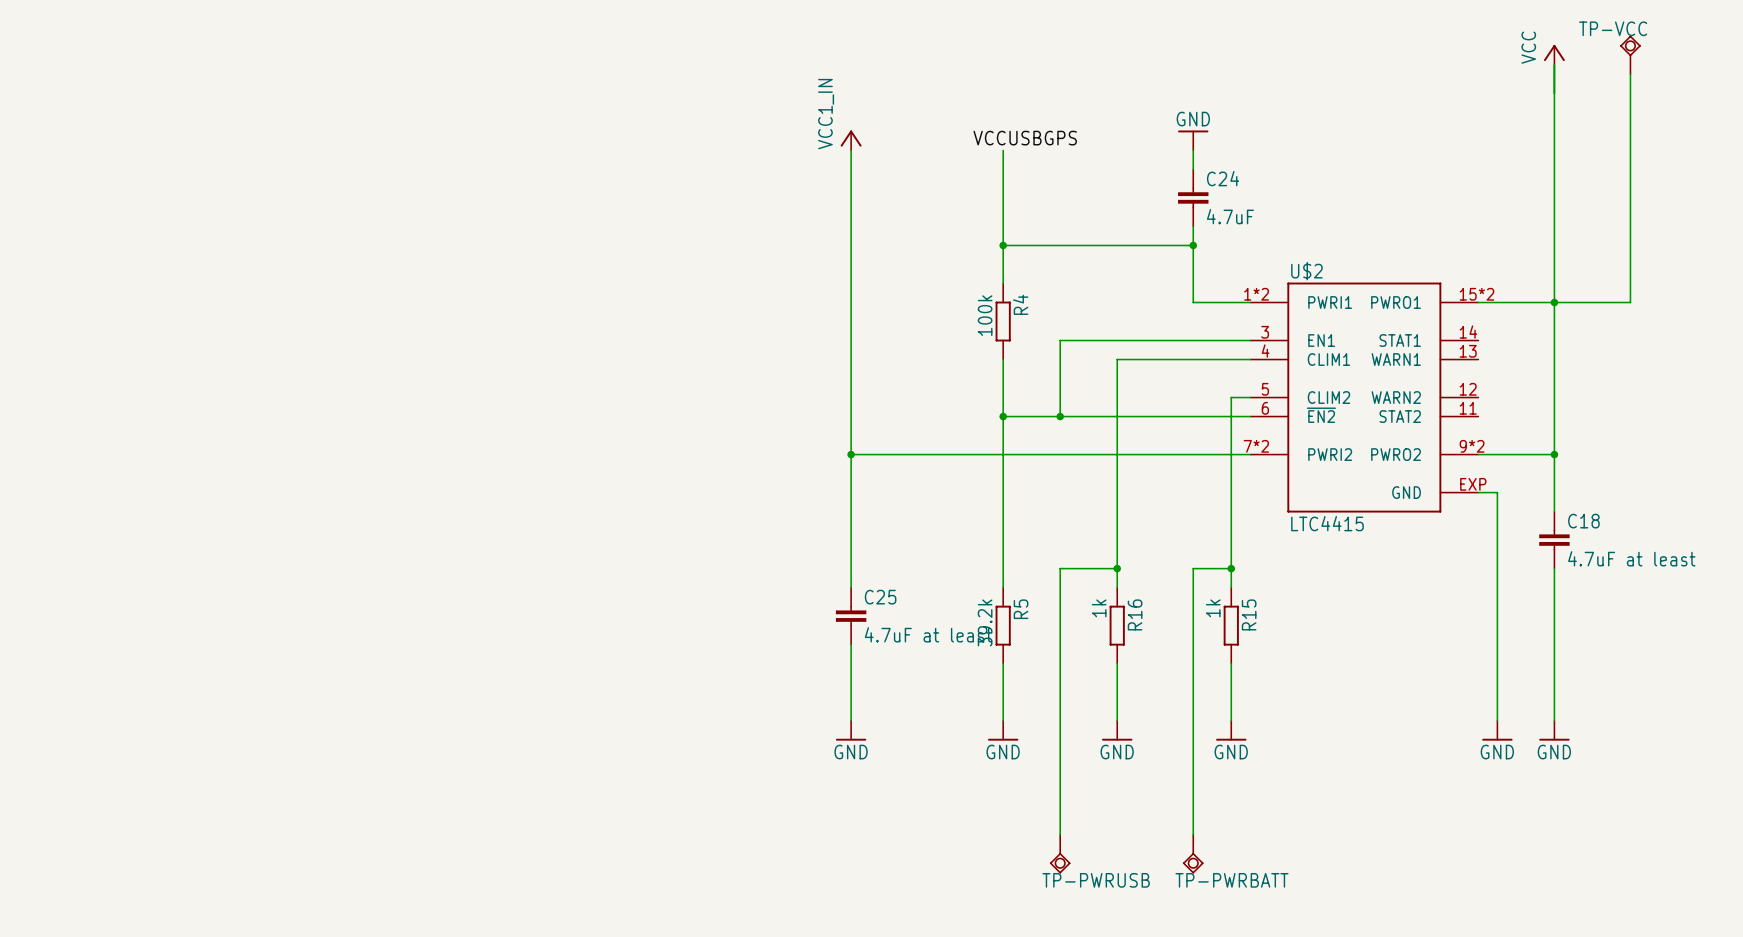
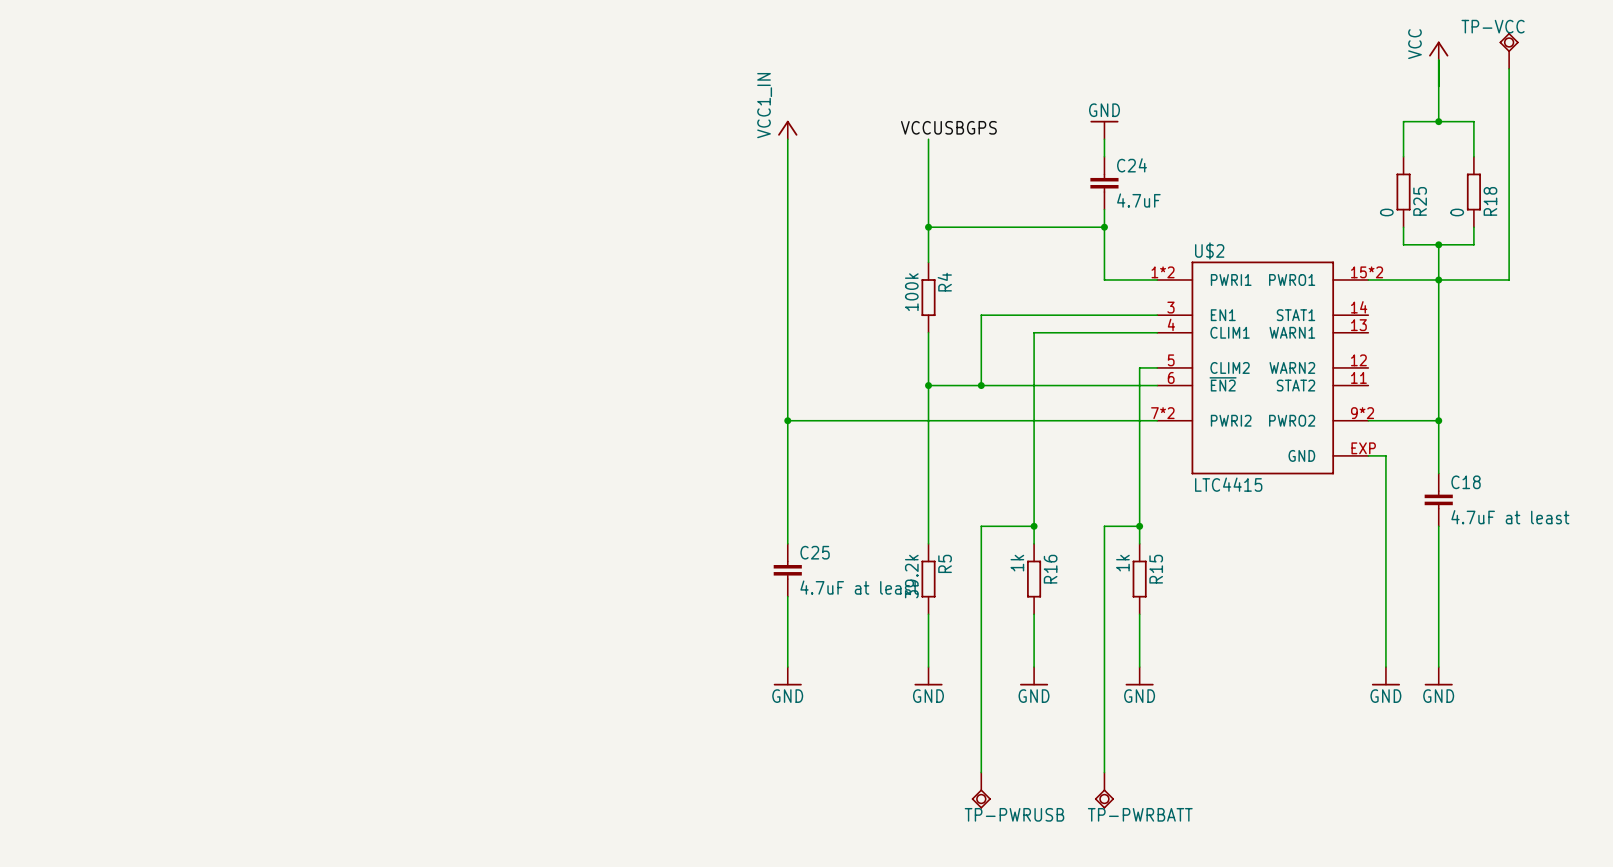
wire: (1554, 131) (1554, 264) -> none
junction: none -> (1438, 121)
wire: none -> (1403, 156) (1403, 121) (1473, 121) (1473, 156)
R25: none -> 0 (1403, 192)
R18: none -> 0 (1473, 192)
wire: none -> (1403, 227) (1403, 244) (1473, 244) (1473, 227)
junction: none -> (1438, 244)

